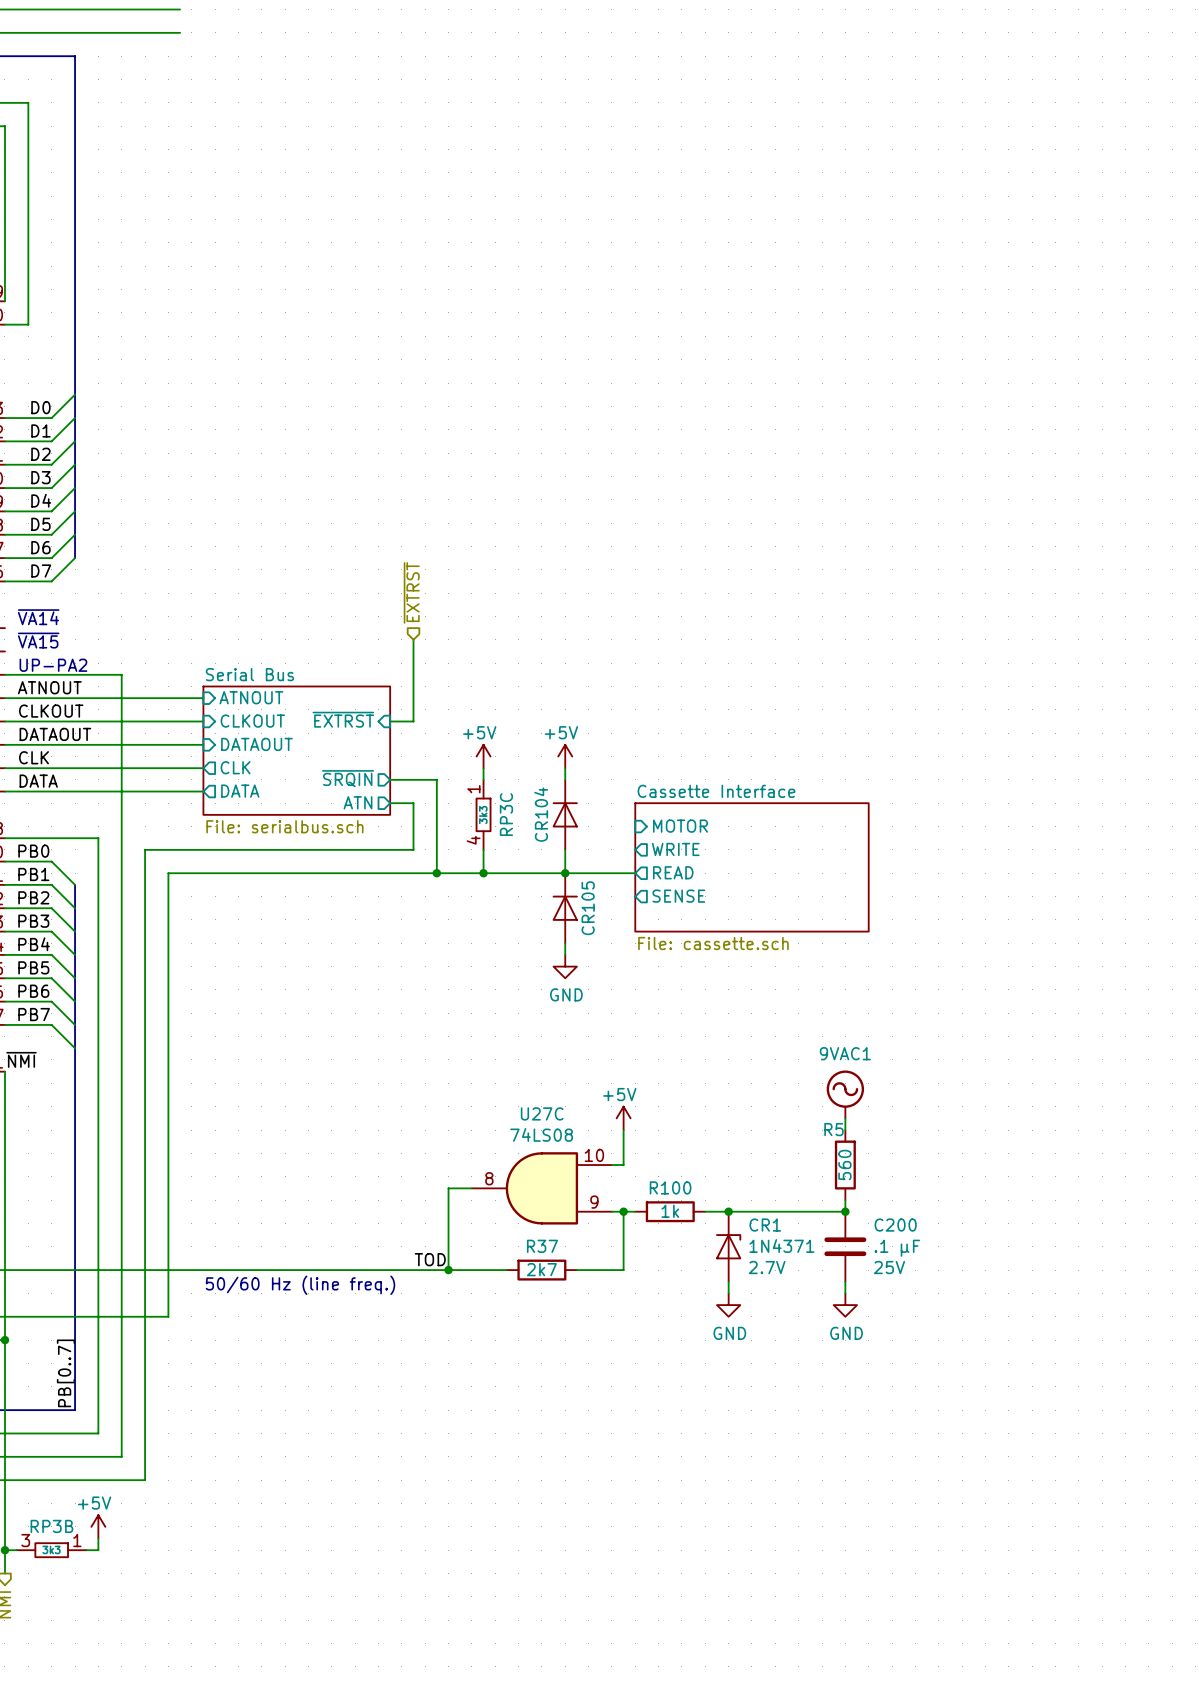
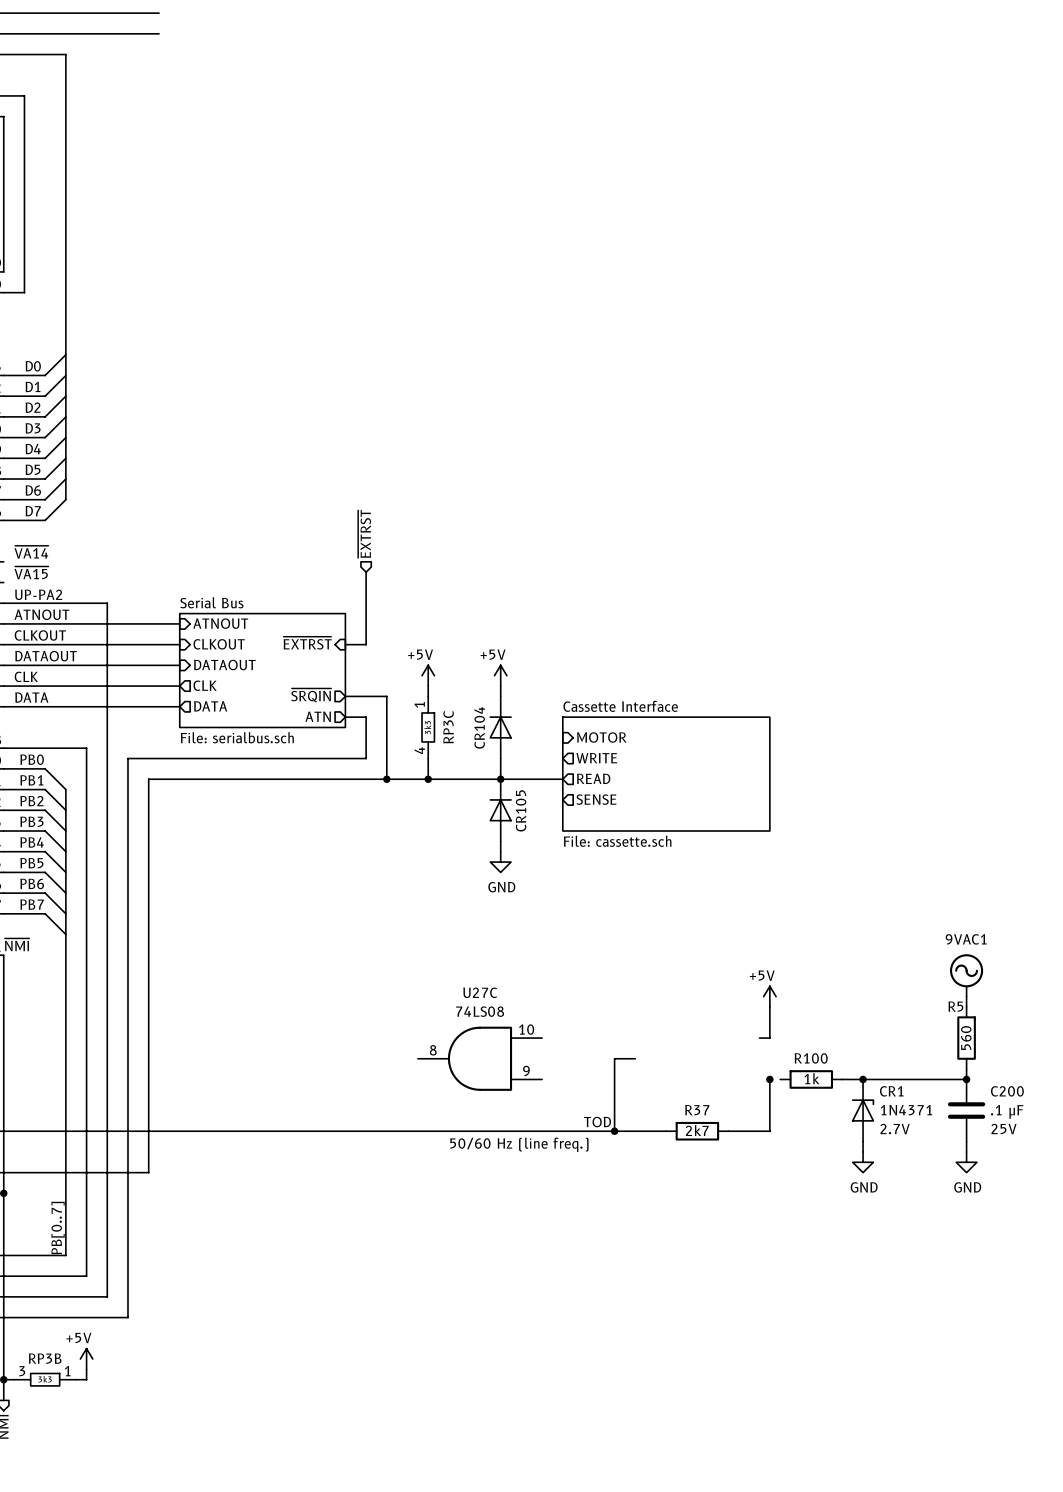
power symbol: 9VAC1 (845, 1094) -> none
power symbol: none -> 9VAC1 (966, 975)
power symbol: +5V (623, 1118) -> none
wire: (845, 1118) (845, 1130) -> none
power symbol: none -> +5V (769, 996)
wire: none -> (966, 996) (966, 1007)
wire: (623, 1130) (623, 1165) (611, 1165) -> none
wire: none -> (769, 1007) (769, 1038) (759, 1038)
R5 position: (845, 1165) -> (966, 1038)
wire: (471, 1188) (448, 1188) (448, 1270) -> none
wire: none -> (635, 1058) (614, 1058) (614, 1131)
wire: (845, 1200) (845, 1211) (705, 1211) -> none
wire: none -> (966, 1069) (966, 1079) (842, 1079)
wire: (611, 1211) (635, 1211) -> none
wire: (623, 1211) (623, 1270) -> (666, 1131) (552, 1131)
junction: (623, 1211) -> none
R100 position: (670, 1211) -> (811, 1079)
junction: (728, 1211) -> none
junction position: (845, 1211) -> (769, 1079)
wire: none -> (769, 1079) (769, 1131) (728, 1131)
junction: none -> (863, 1079)
junction: none -> (966, 1079)
CR1 position: (728, 1246) -> (863, 1110)
C200 position: (845, 1246) -> (966, 1110)
label: TOD (430, 1259) -> none
label: none -> TOD (597, 1122)
junction: (448, 1270) -> none
wire: none -> (448, 1131) (511, 1131)
R37 position: (541, 1270) -> (697, 1131)
junction: none -> (614, 1131)
wire: (728, 1281) (728, 1293) -> none
wire: (845, 1281) (845, 1293) -> (863, 1141) (863, 1151)
wire: none -> (966, 1141) (966, 1151)
text: 50/60 Hz (line freq.) (300, 1285) -> none
text: none -> 50/60 Hz (line freq.) (519, 1144)
power symbol: GND (728, 1305) -> none
power symbol: GND (845, 1305) -> none
power symbol: none -> GND (863, 1162)
power symbol: none -> GND (966, 1162)

